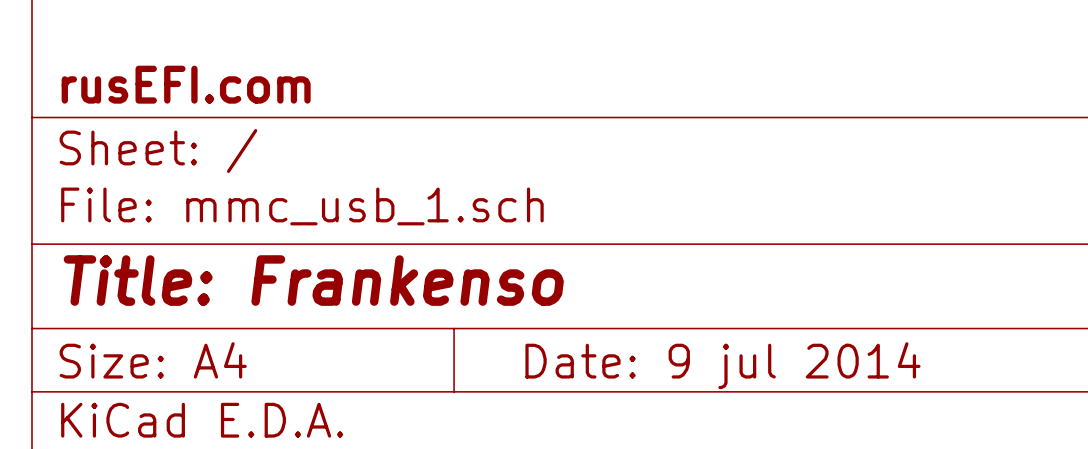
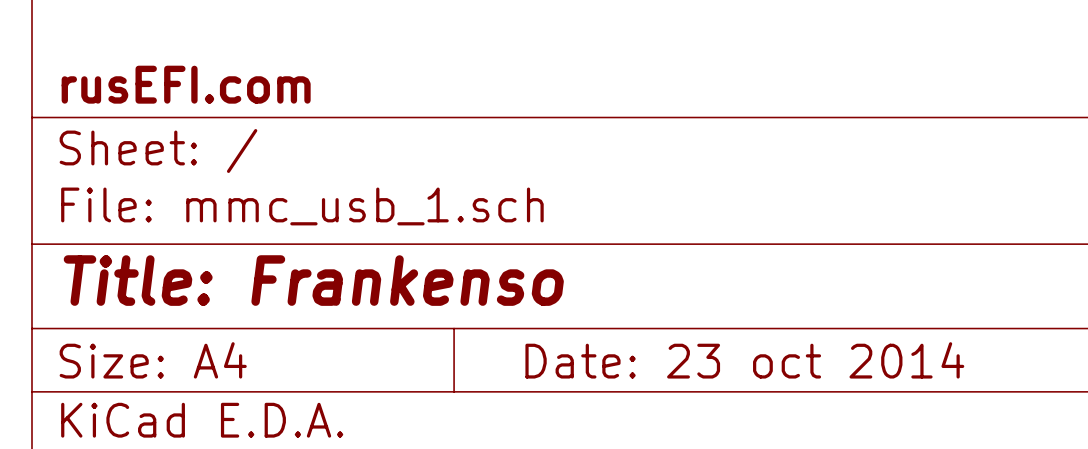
title block: Date: 9 jul 2014 (722, 365) -> Date: 23 oct 2014 (744, 360)

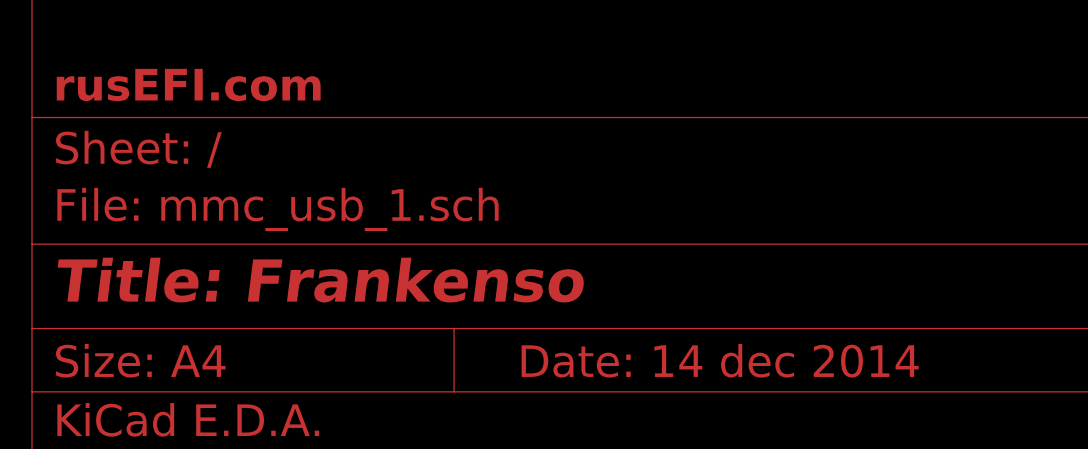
title block: Date: 23 oct 2014 (744, 360) -> Date: 14 dec 2014 (720, 360)

